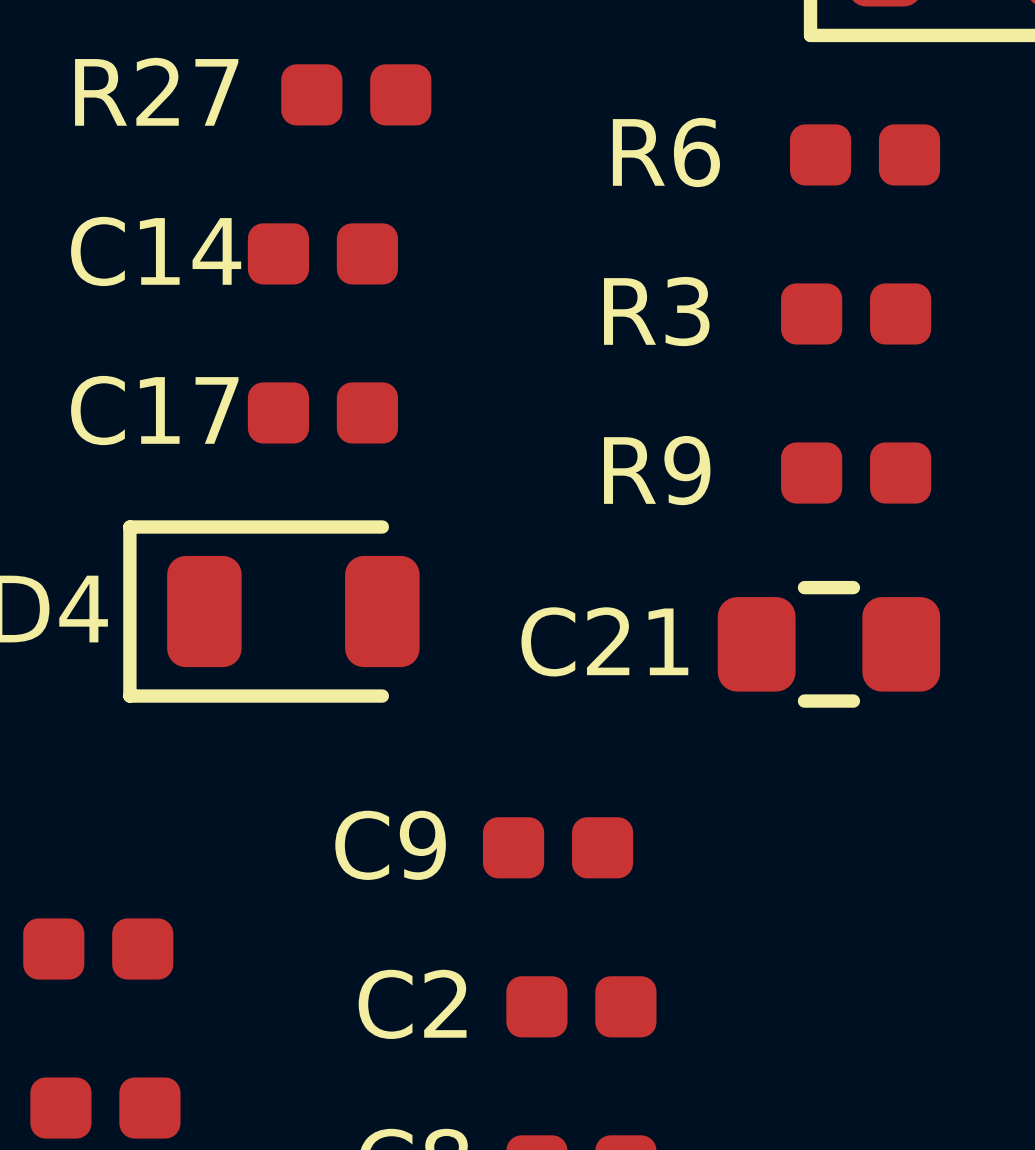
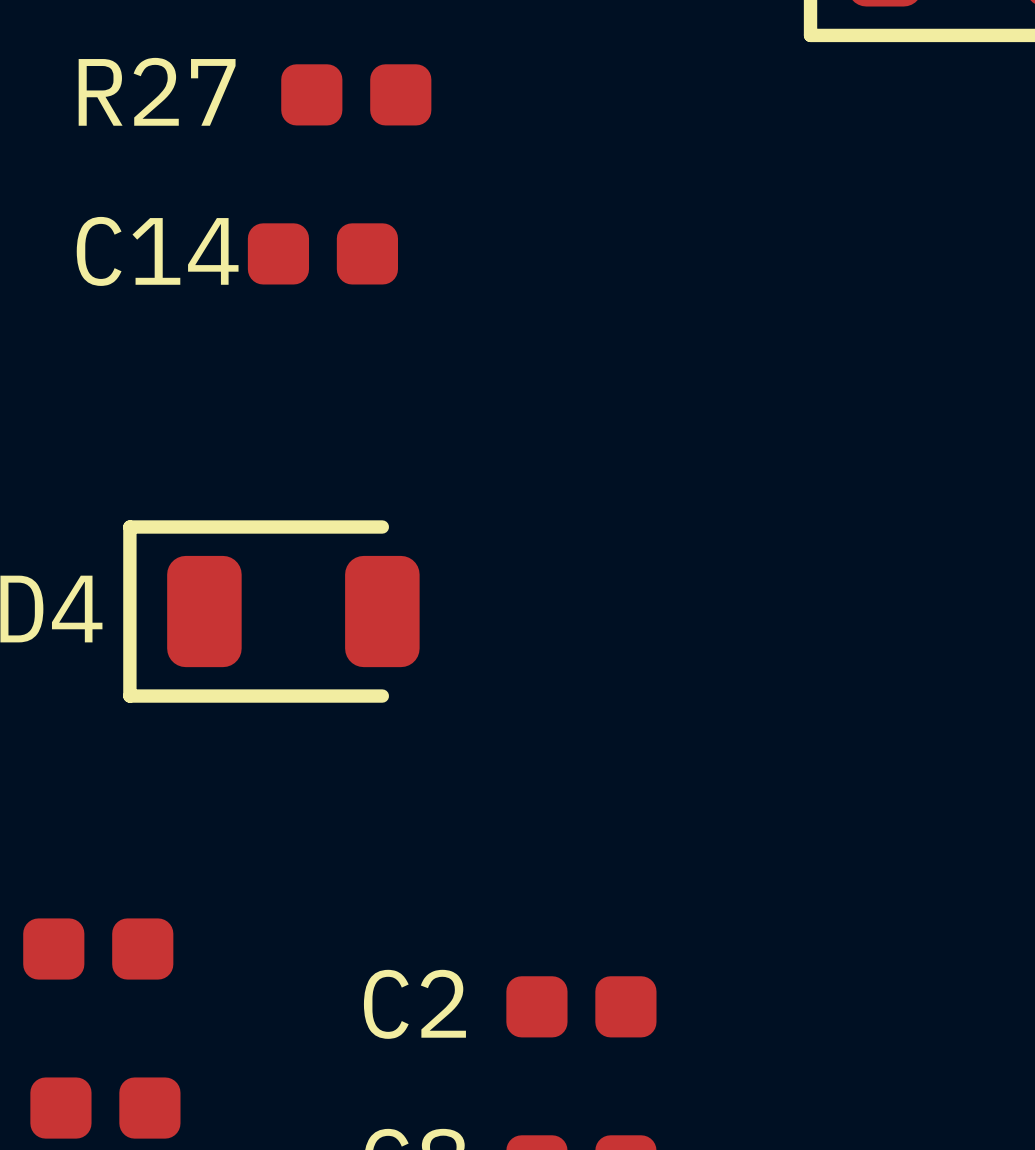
R6: (865, 154) -> none
R3: (856, 313) -> none
C17: (322, 412) -> none
R9: (856, 473) -> none
C21: (828, 644) -> none
C9: (558, 847) -> none

